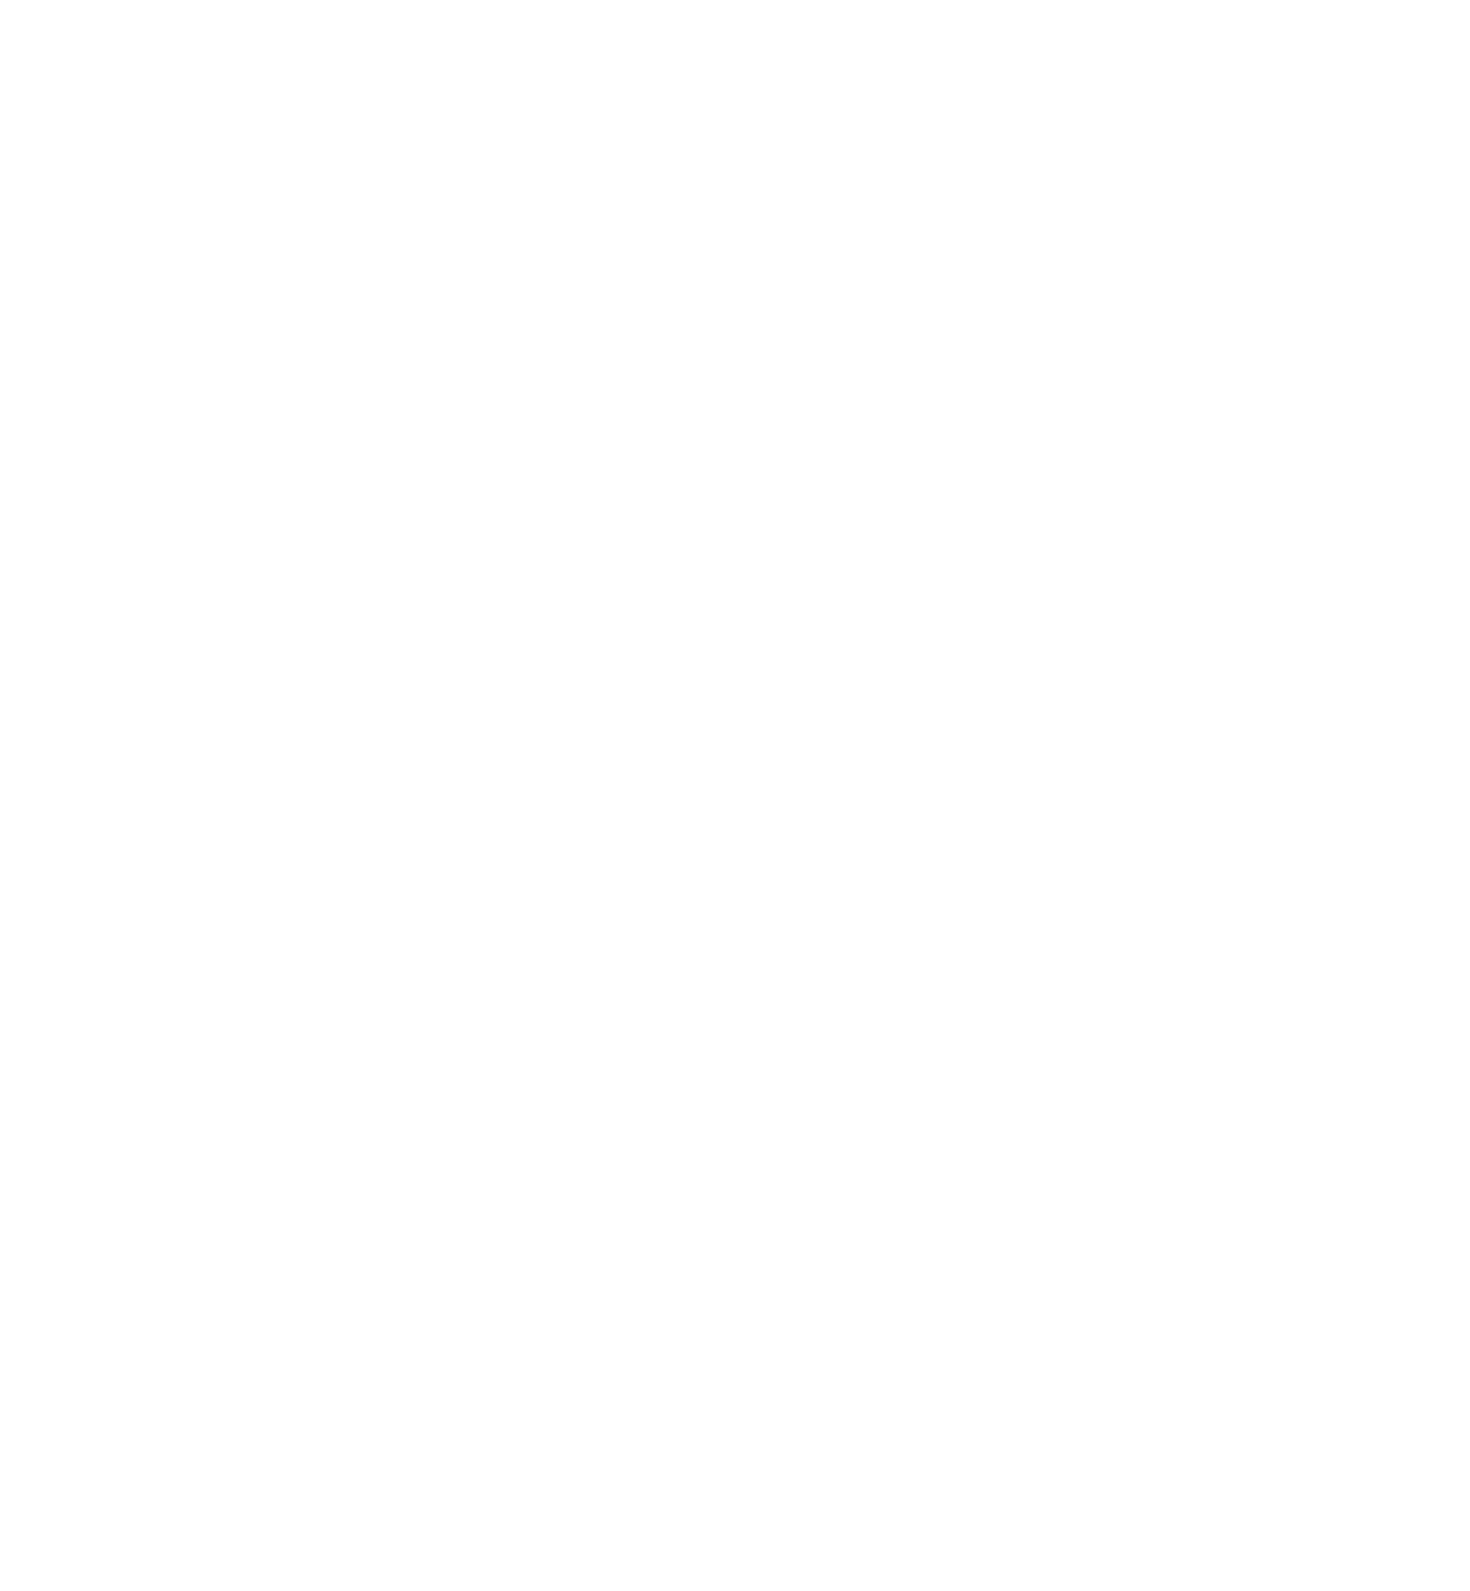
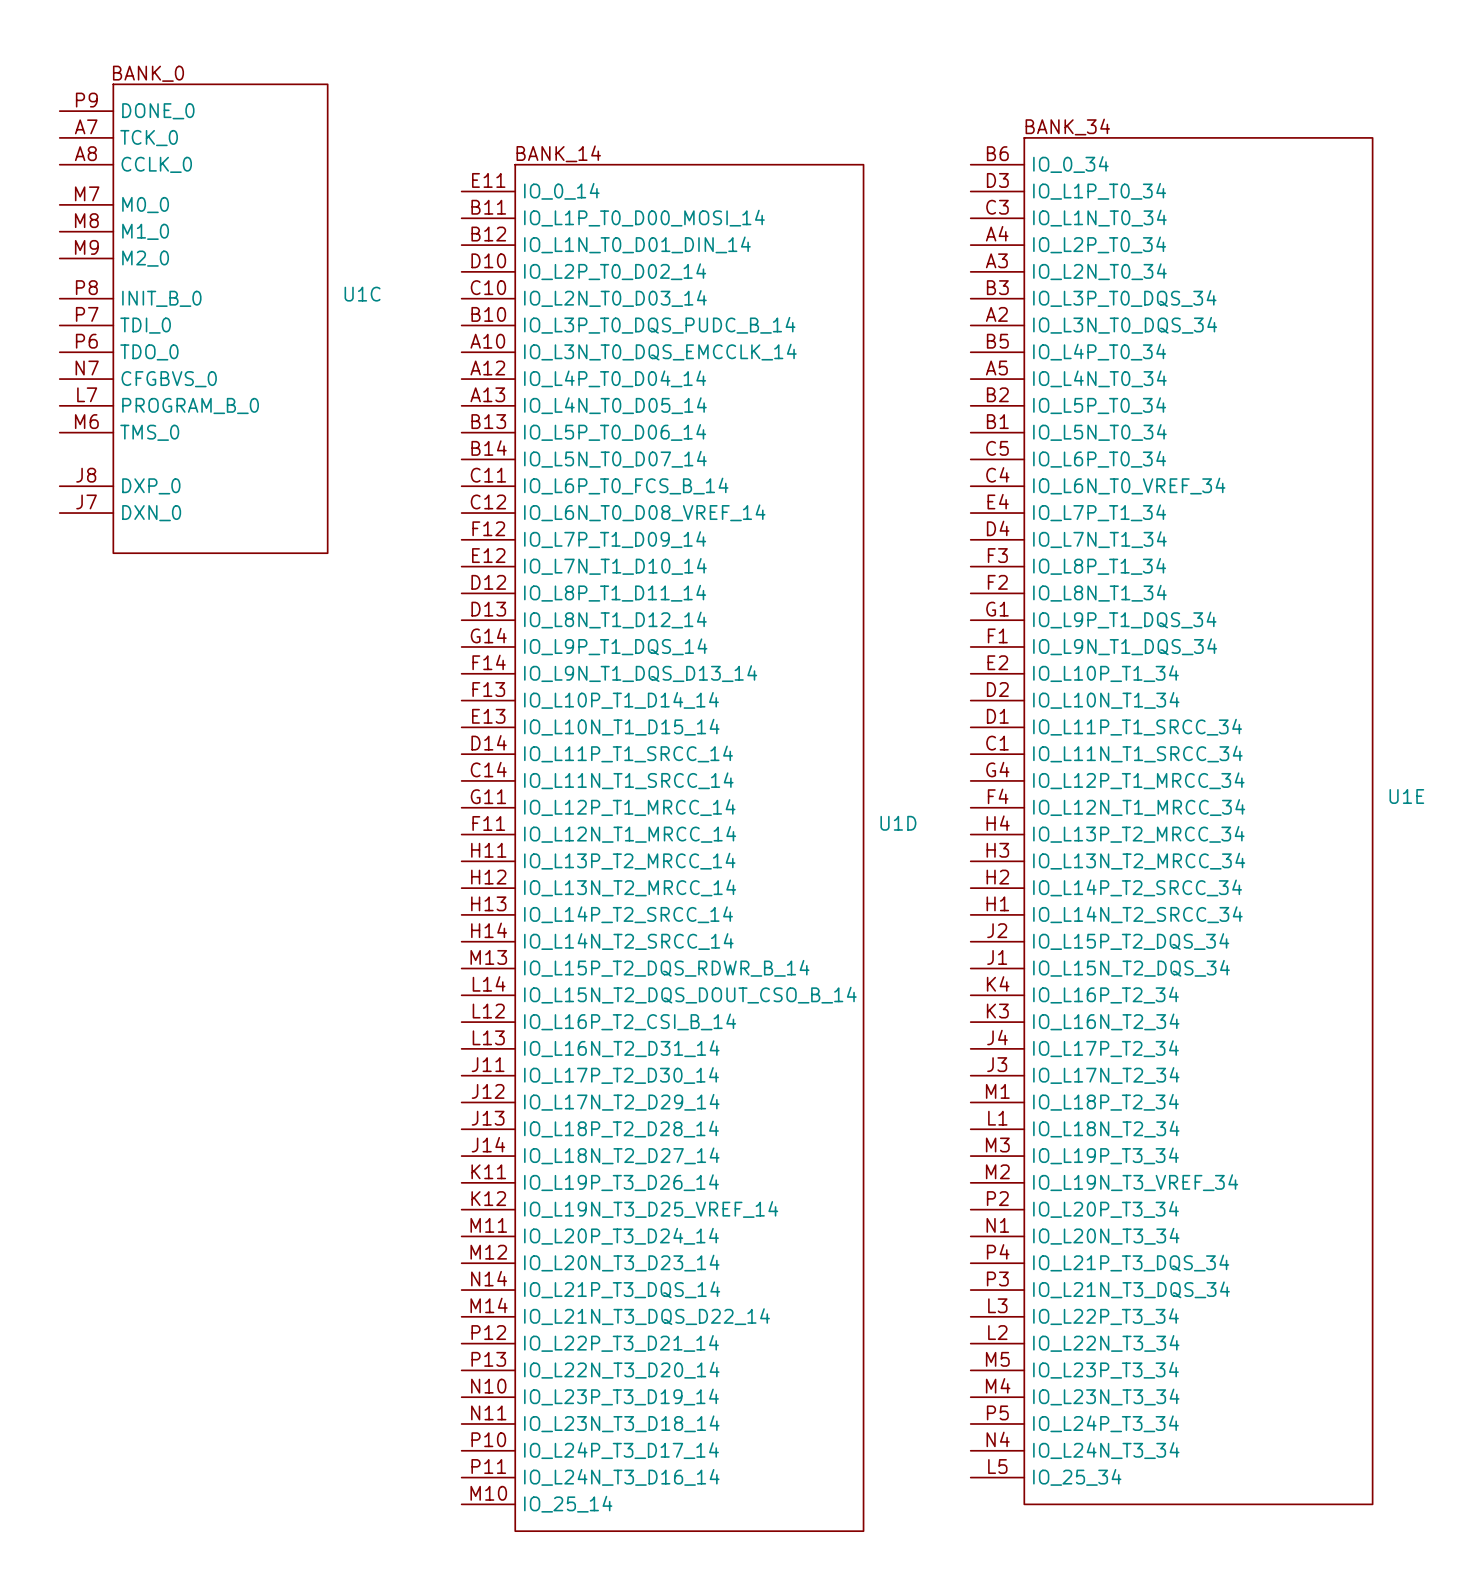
U1C: none -> (193, 318)
U1E: none -> (1171, 821)
U1D: none -> (662, 847)

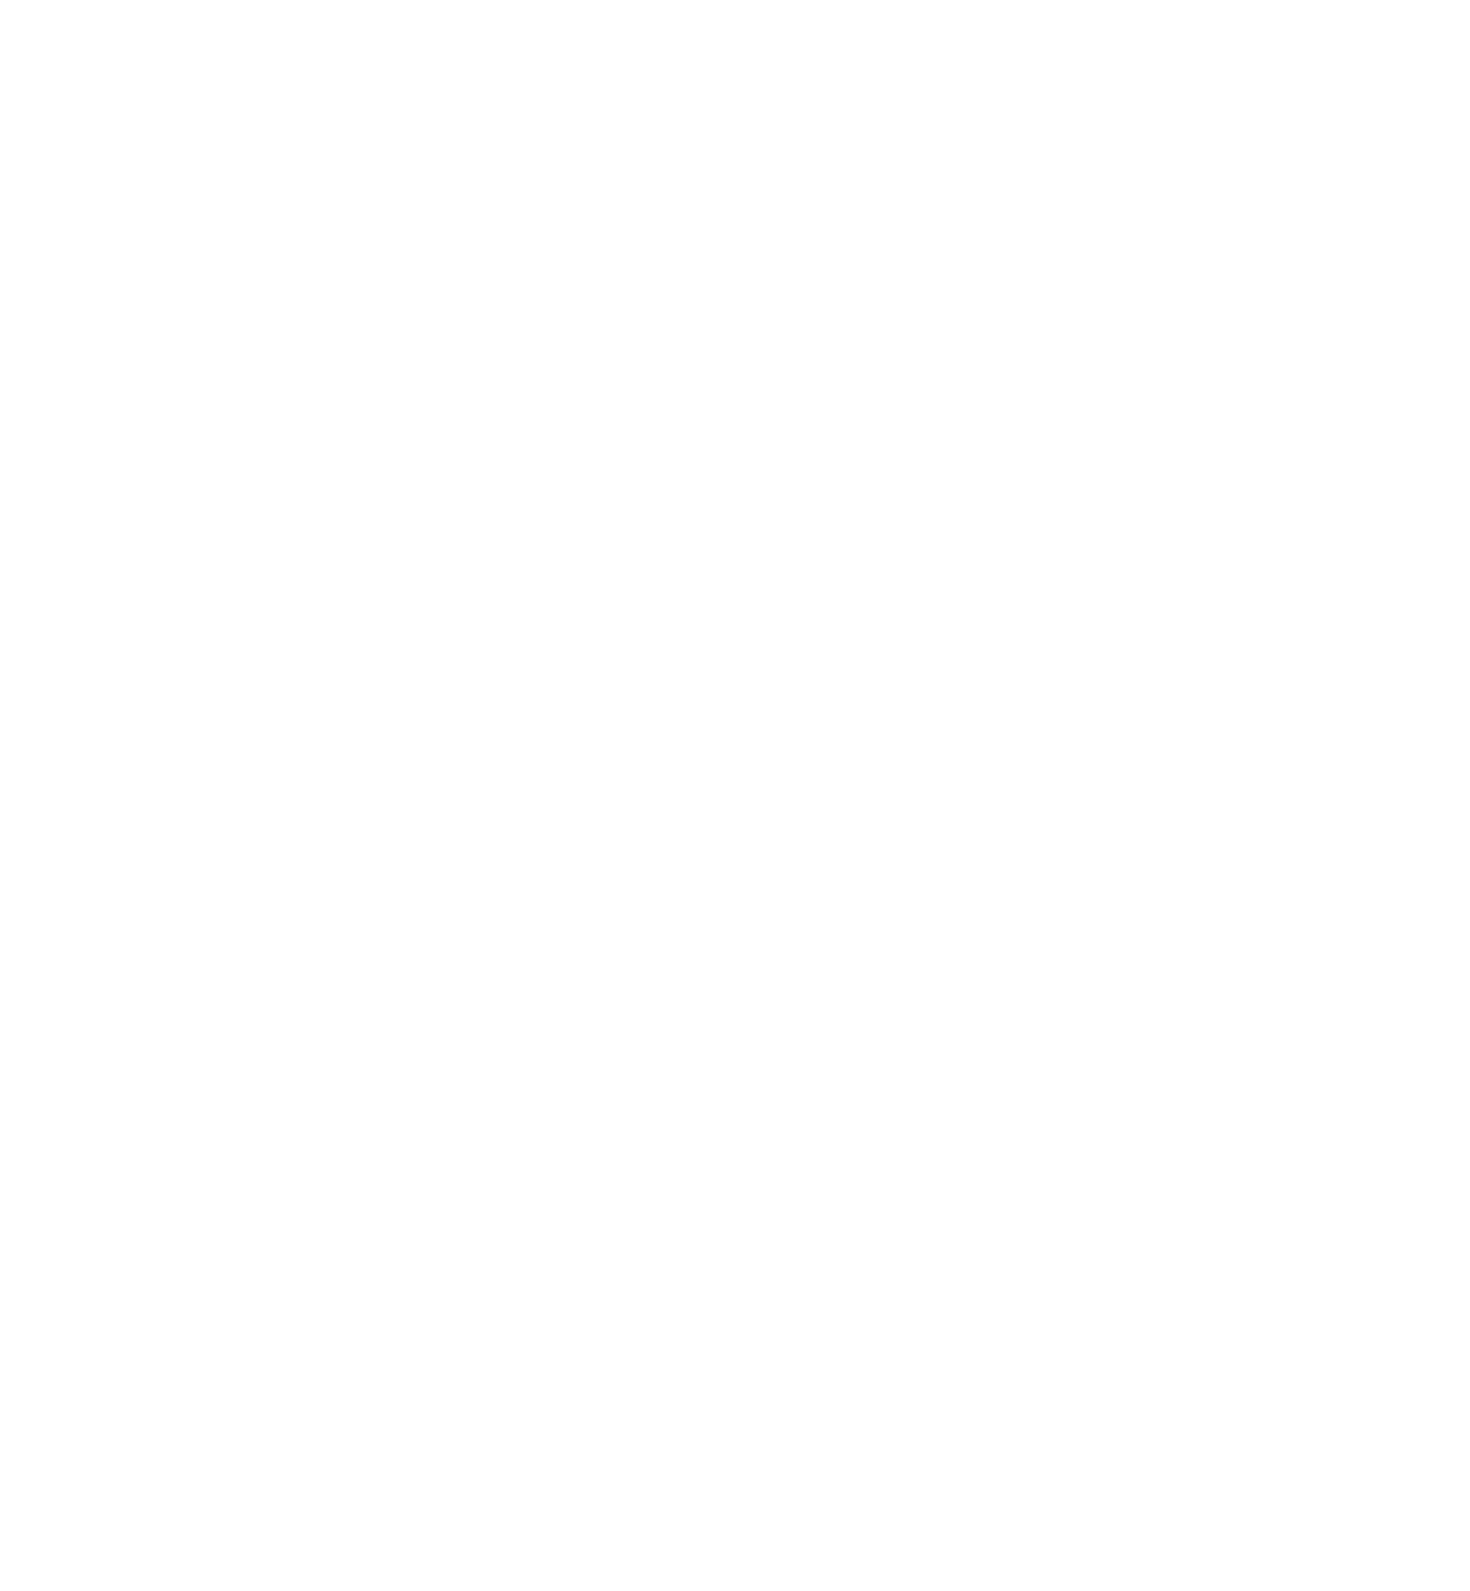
U1C: (193, 318) -> none
U1E: (1171, 821) -> none
U1D: (662, 847) -> none

